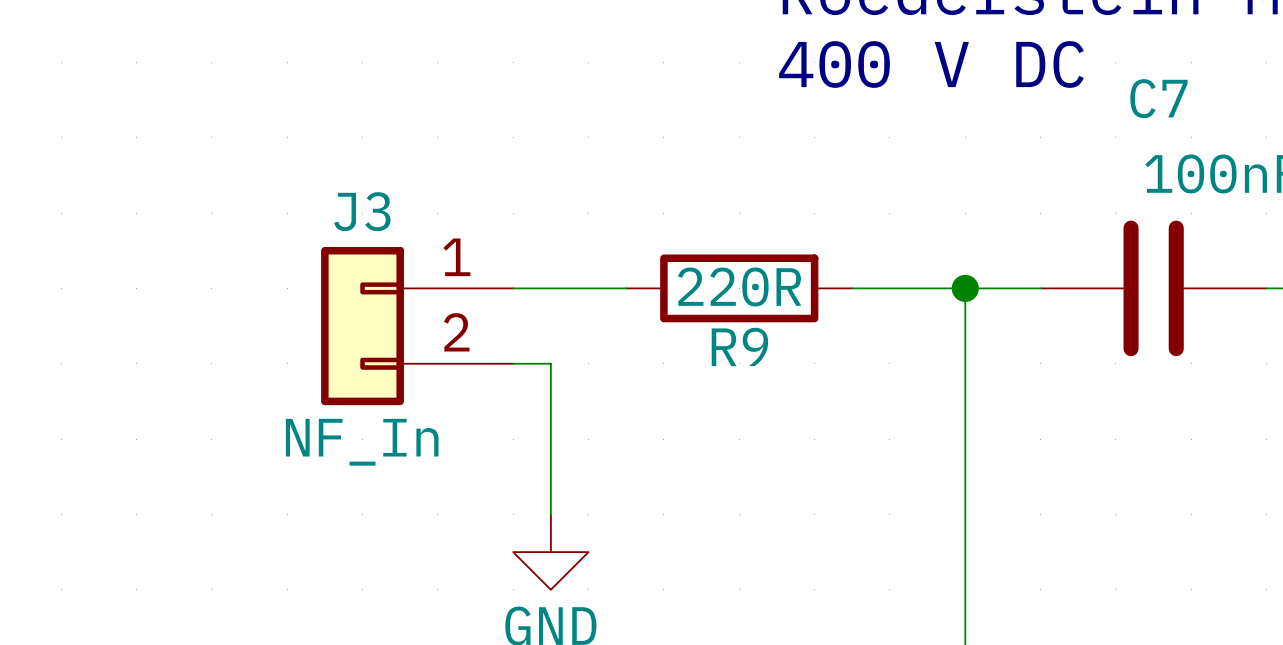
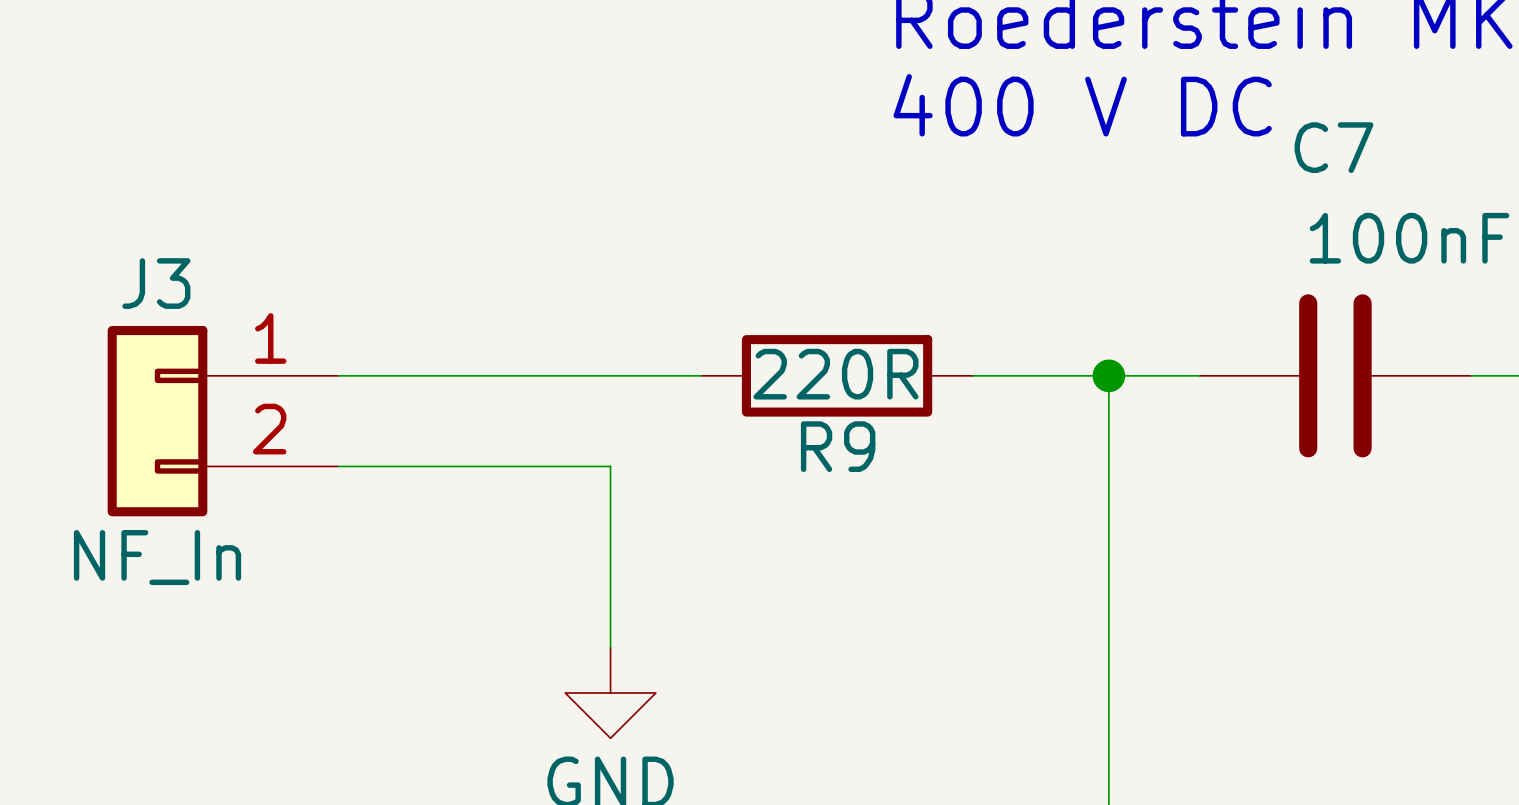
J3 position: (417, 326) -> (223, 421)

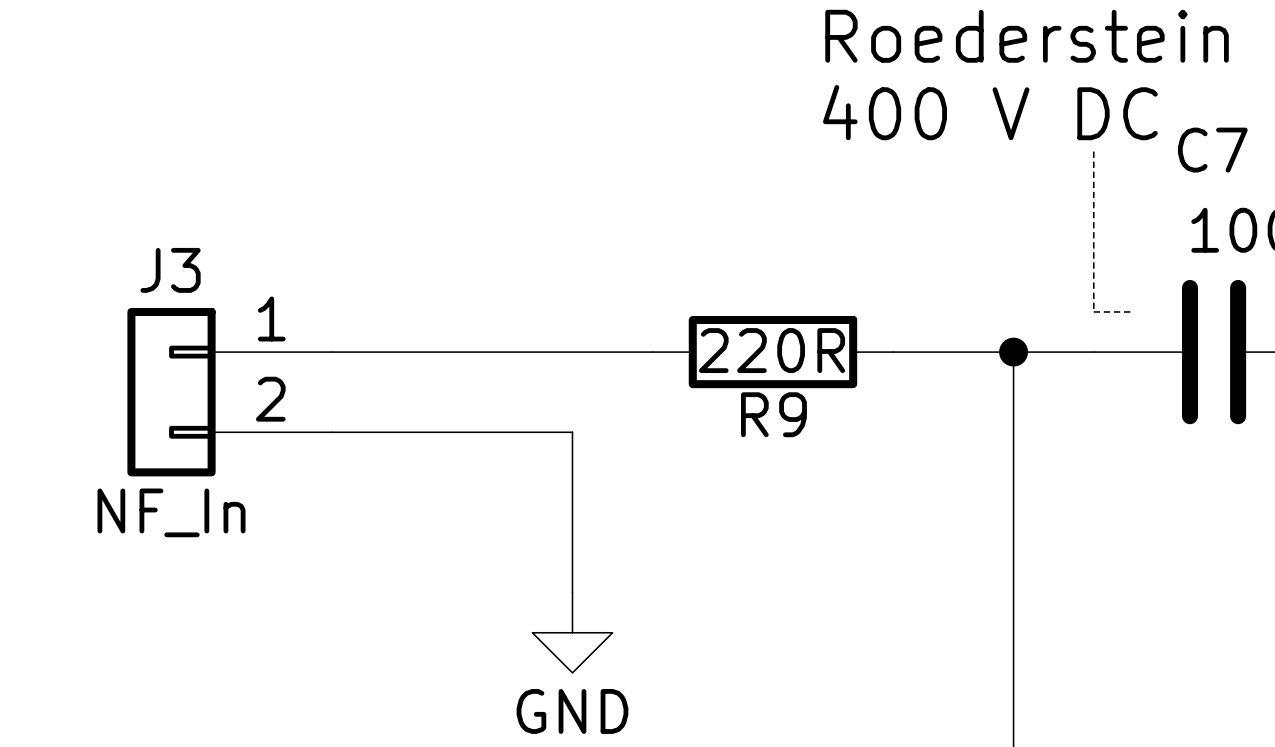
line: none -> (1093, 151) (1093, 311) (1133, 311)

